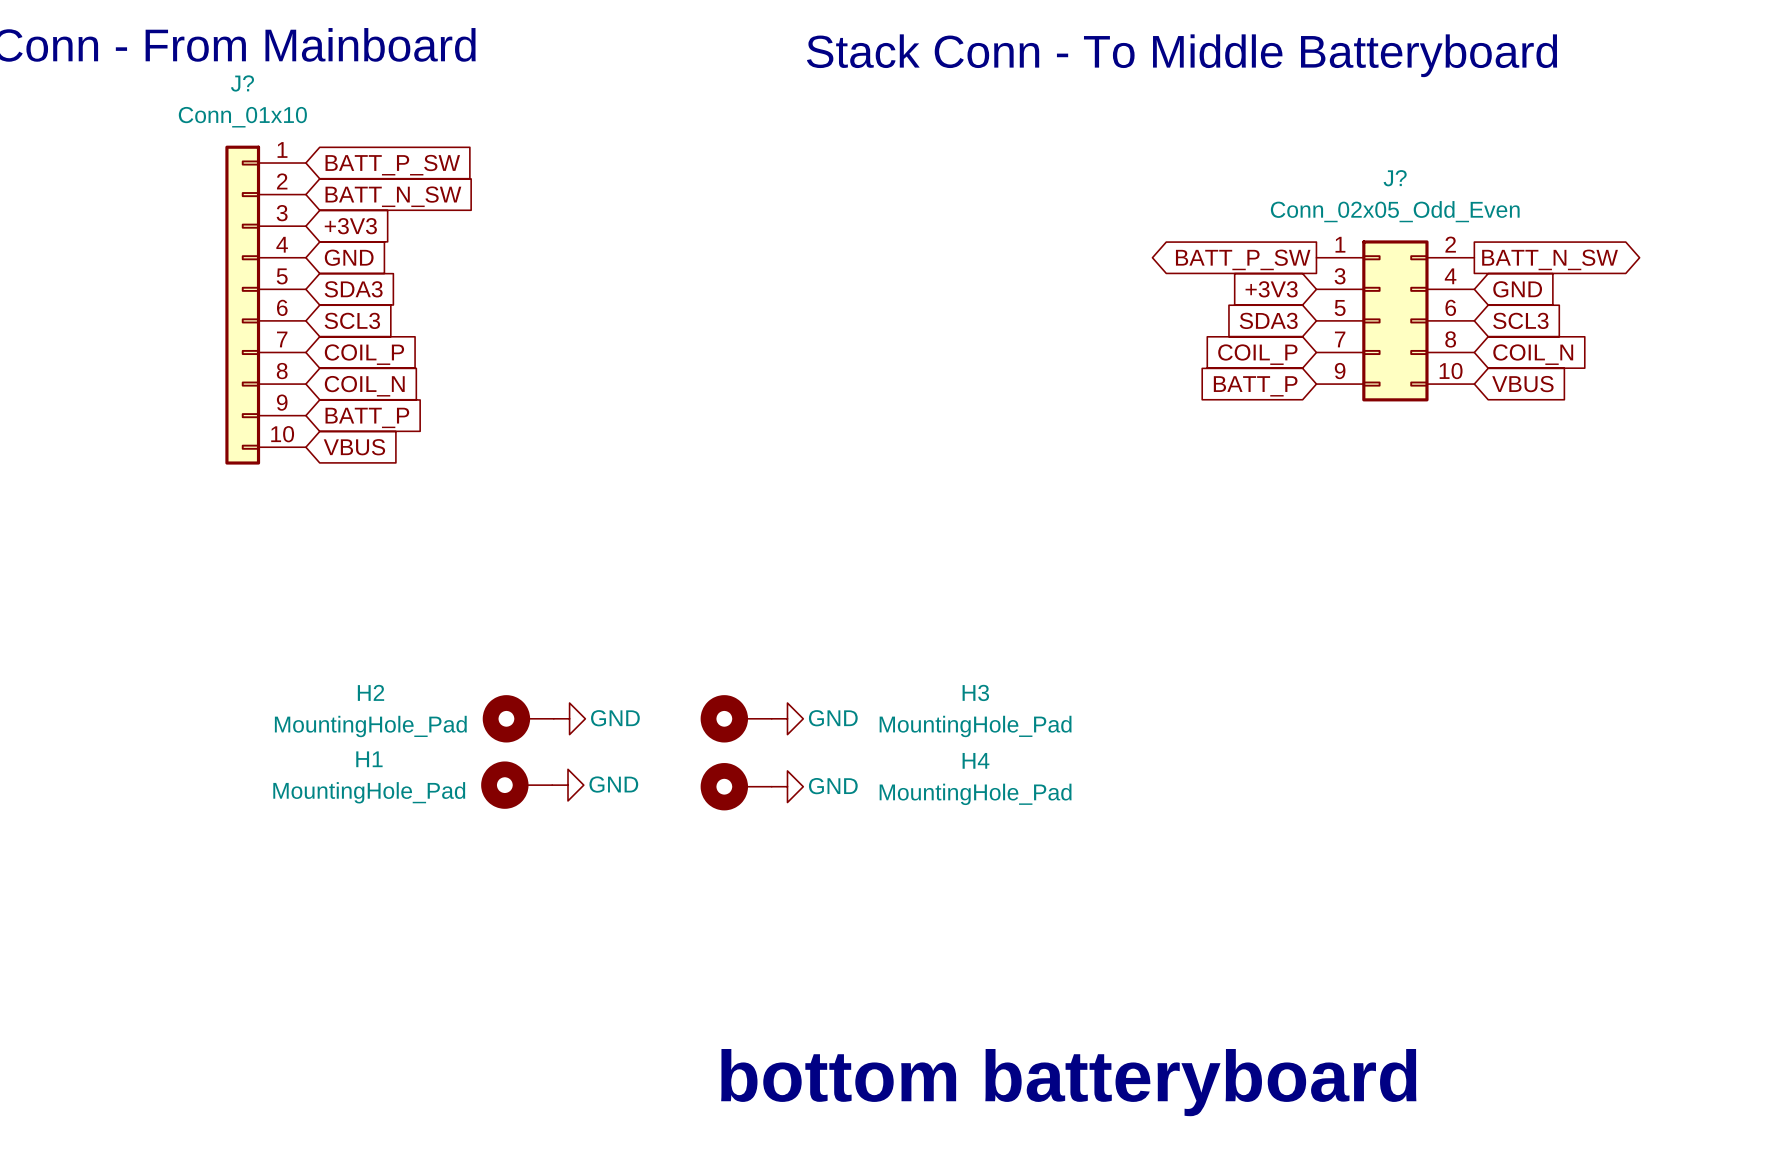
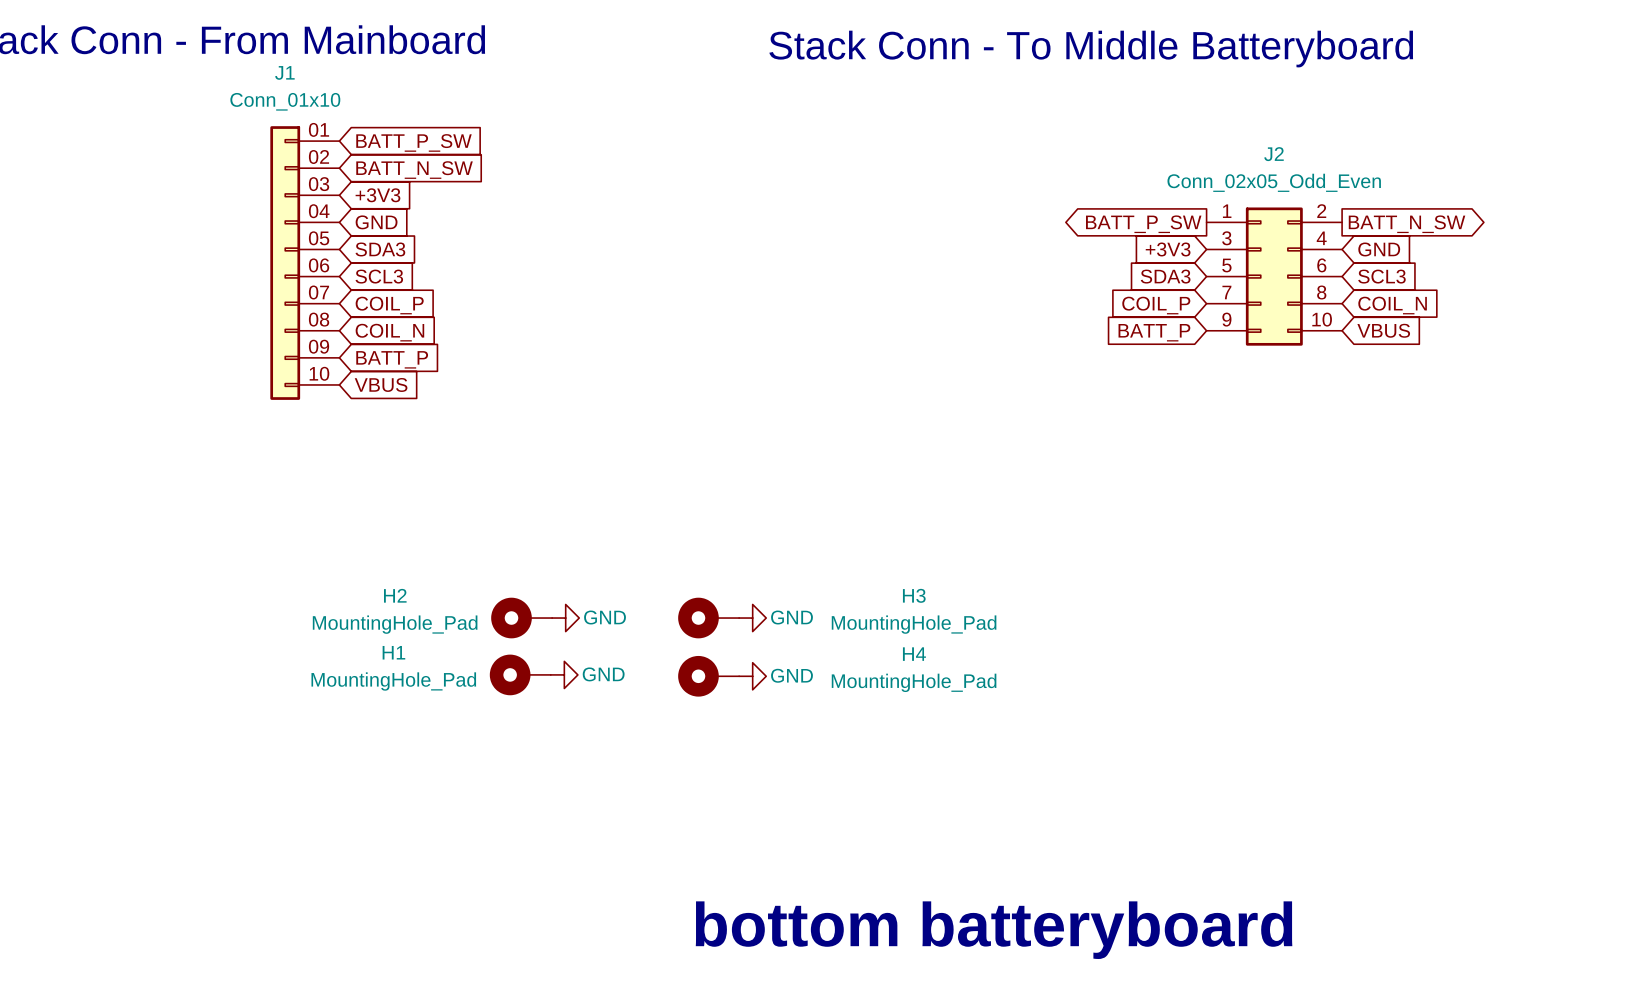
J? name: J? (242, 83) -> J1 (284, 72)
J? symbol: [225, 145, 306, 465] -> [270, 126, 340, 400]
J? name: J? (1395, 178) -> J2 (1273, 154)

